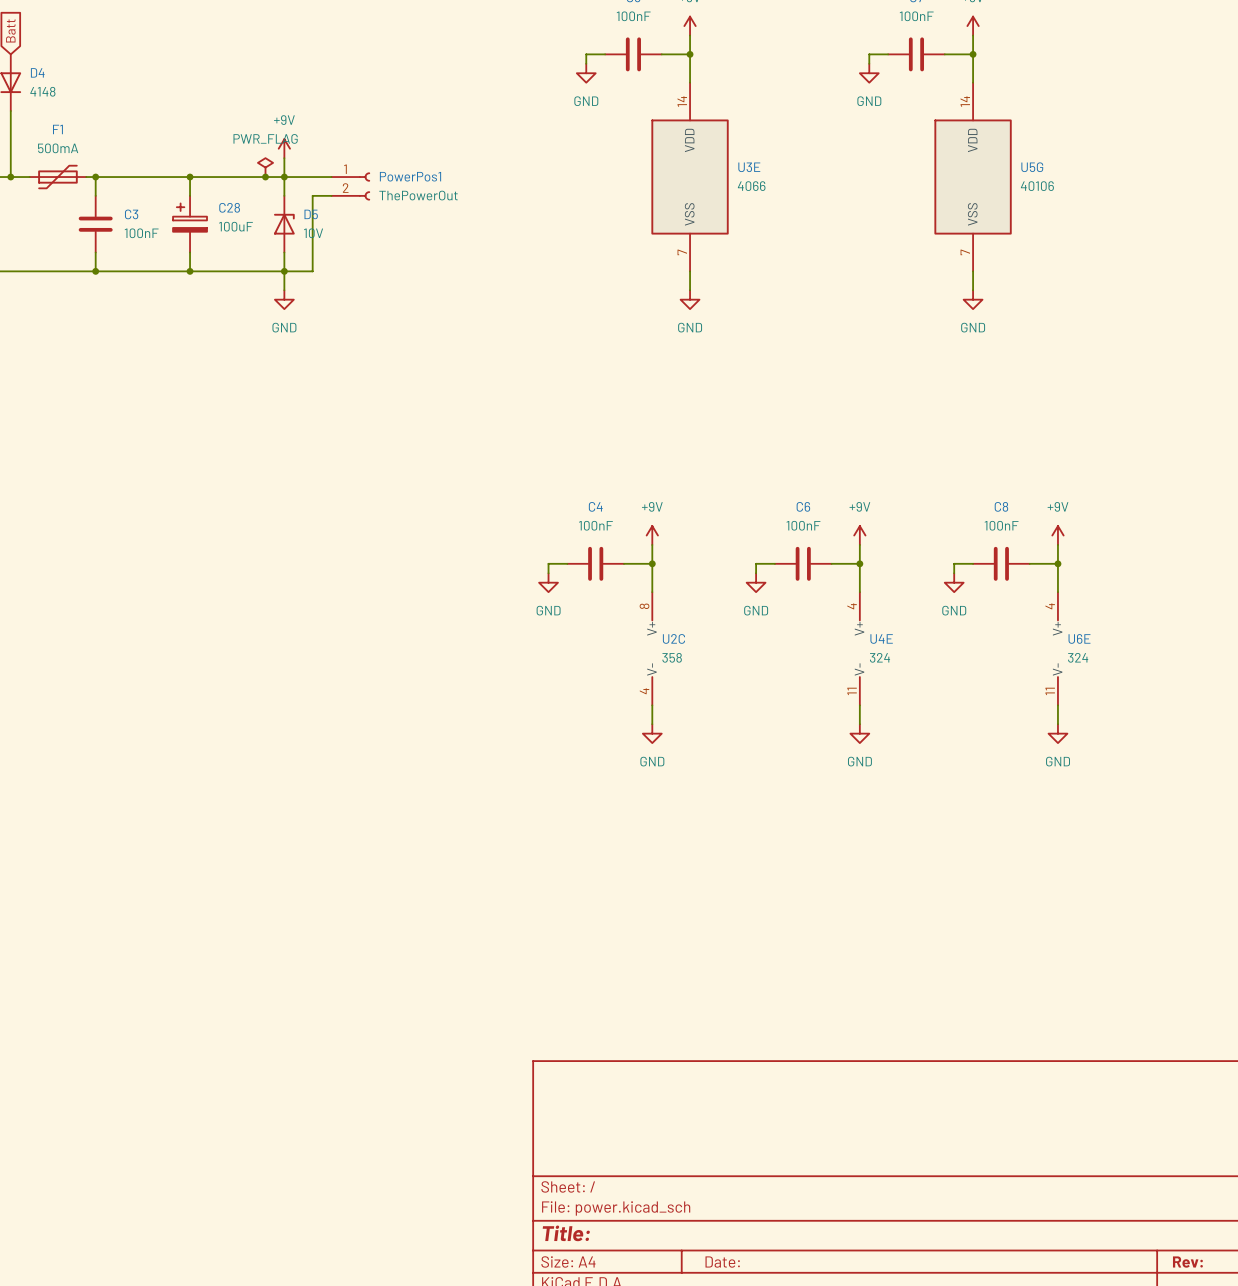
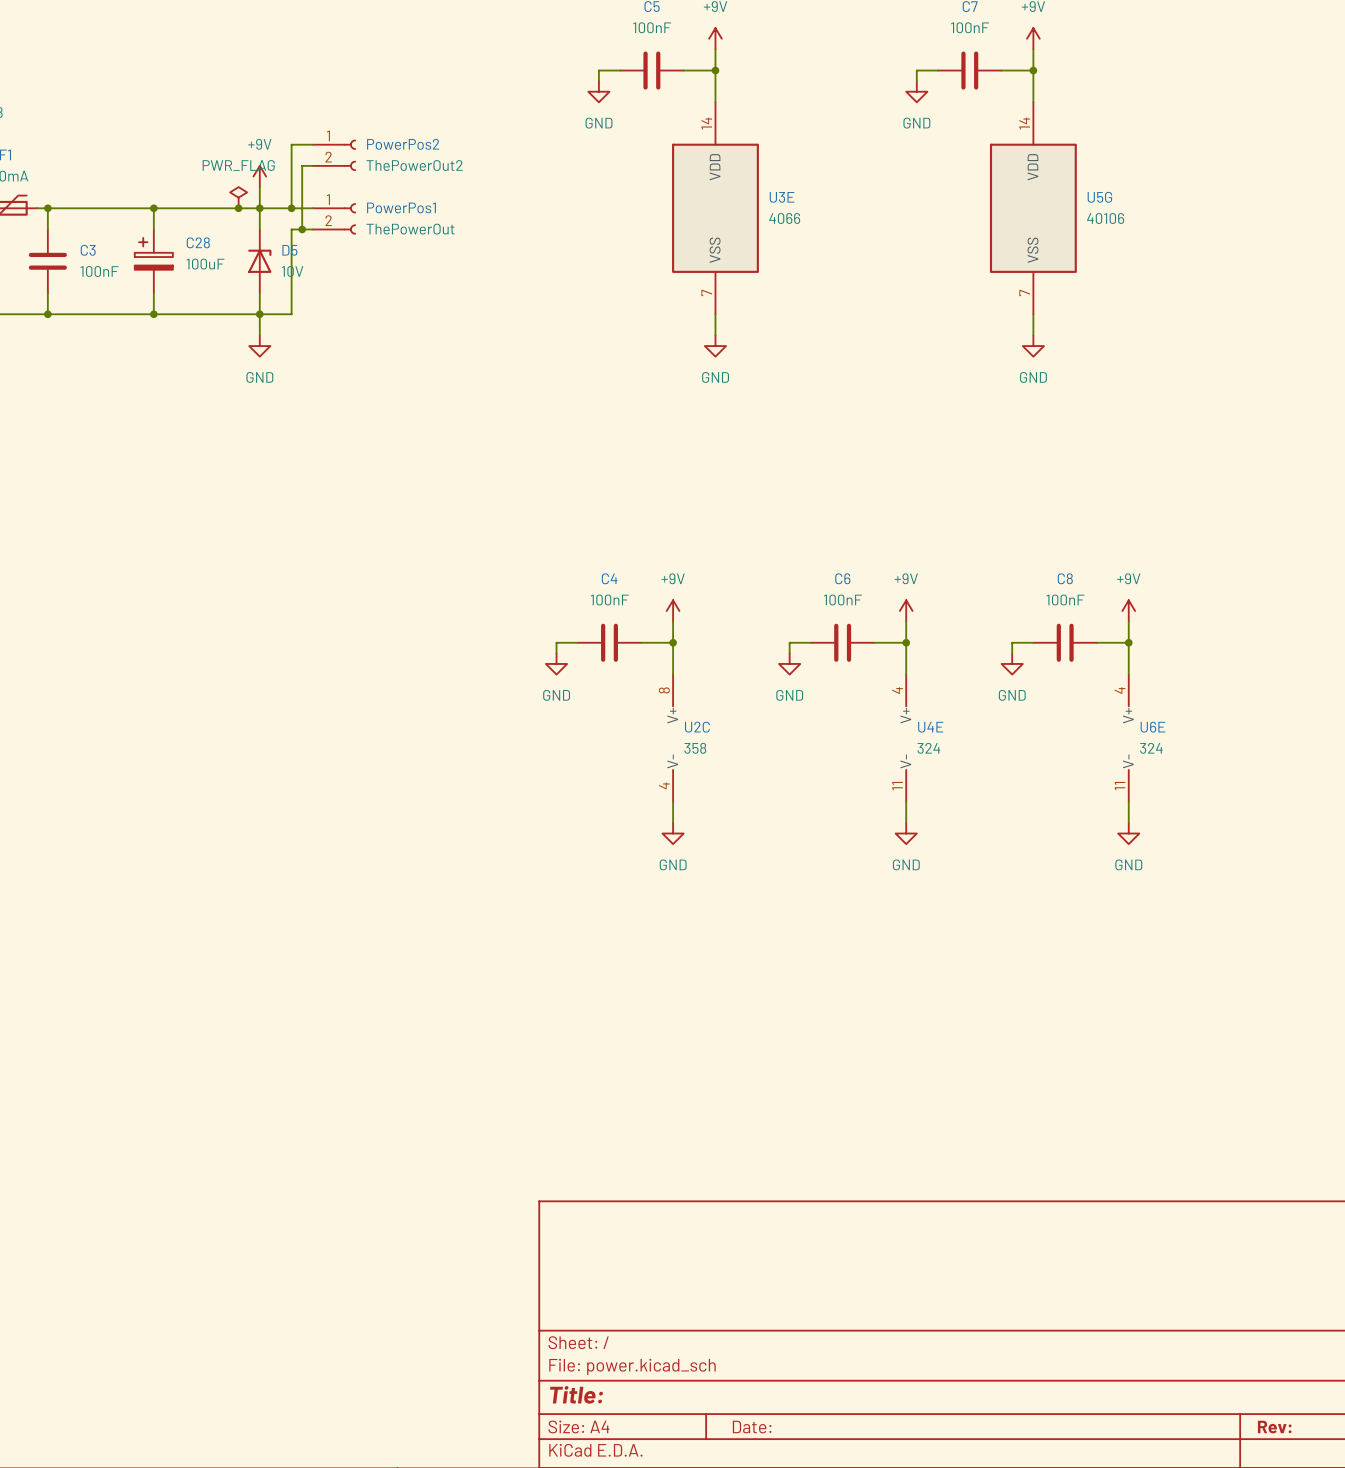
wire: none -> (312, 144) (291, 144) (291, 208)
PowerPos2: none -> ThePowerOut2 (334, 155)
wire: none -> (312, 165) (302, 165) (302, 229)
junction: none -> (291, 208)
junction: none -> (302, 229)

